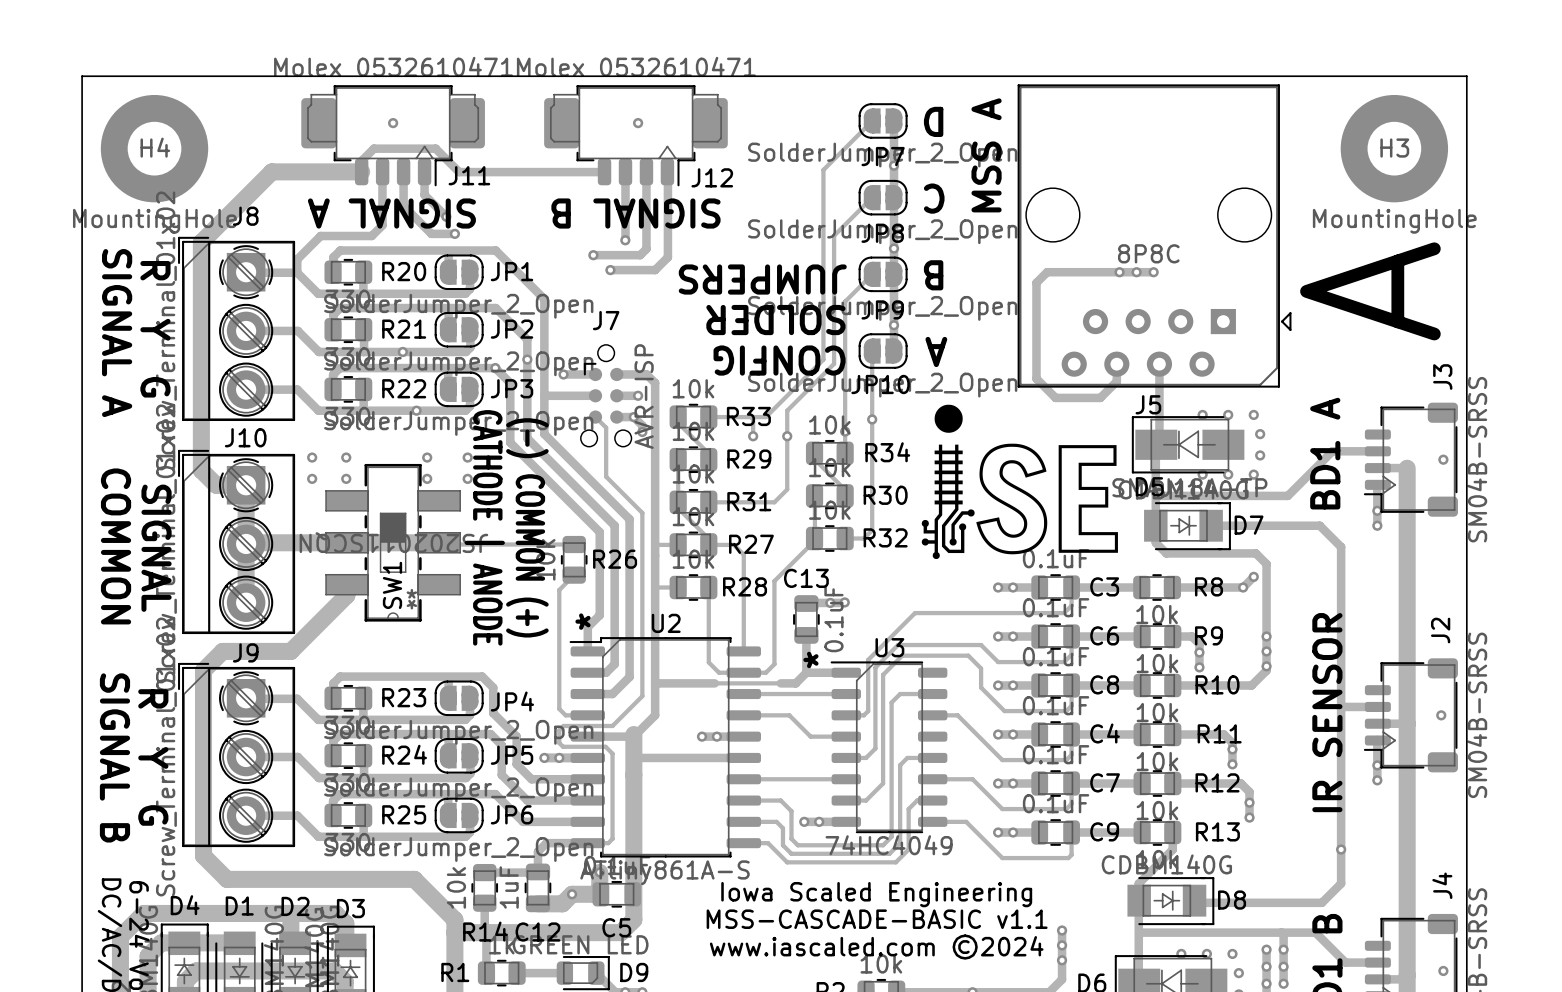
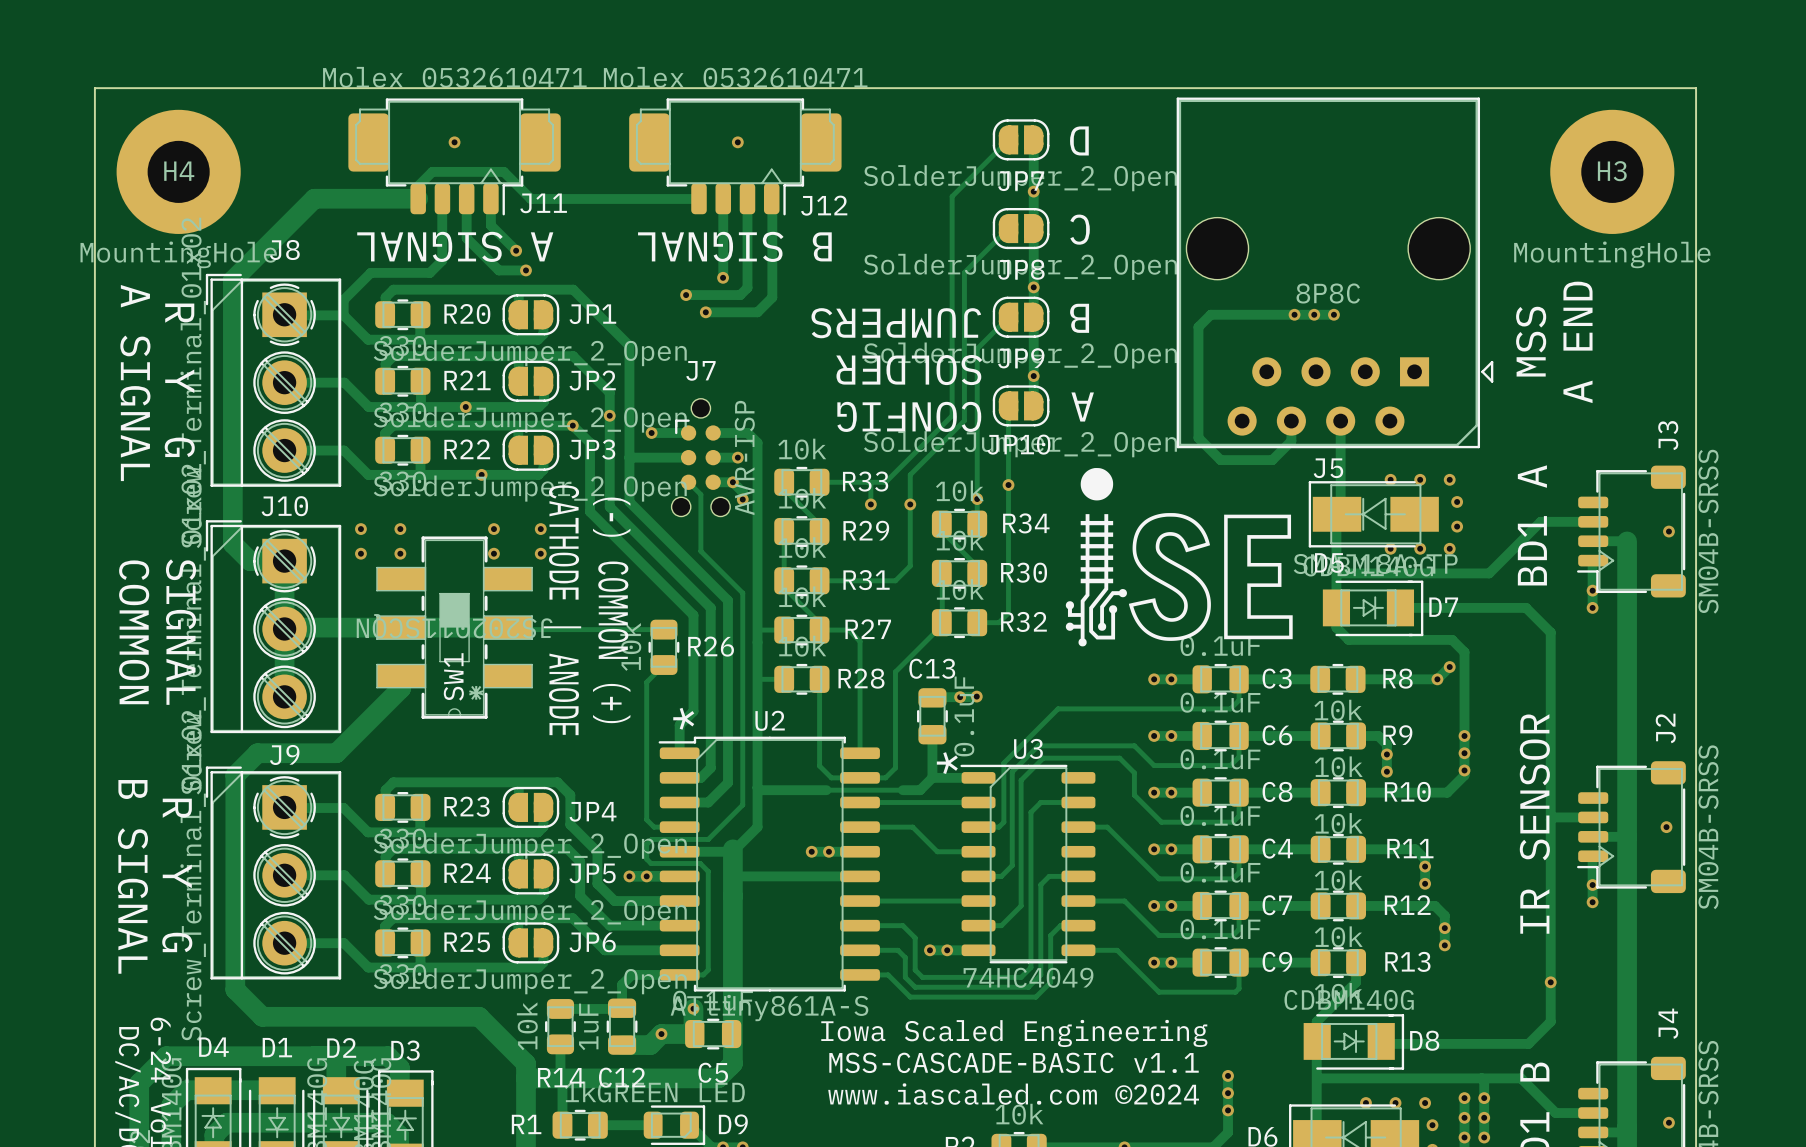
text: MSS A (986, 155) -> none
text: SIGNAL A (391, 213) -> A SIGNAL (455, 246)
text: SIGNAL B (635, 213) -> B SIGNAL (734, 246)
text: A (1370, 291) -> A END (1577, 342)
text: none -> MSS (1531, 341)
text: SIGNAL A (117, 333) -> A SIGNAL (135, 383)
text: SIGNAL B (114, 757) -> B SIGNAL (132, 876)

